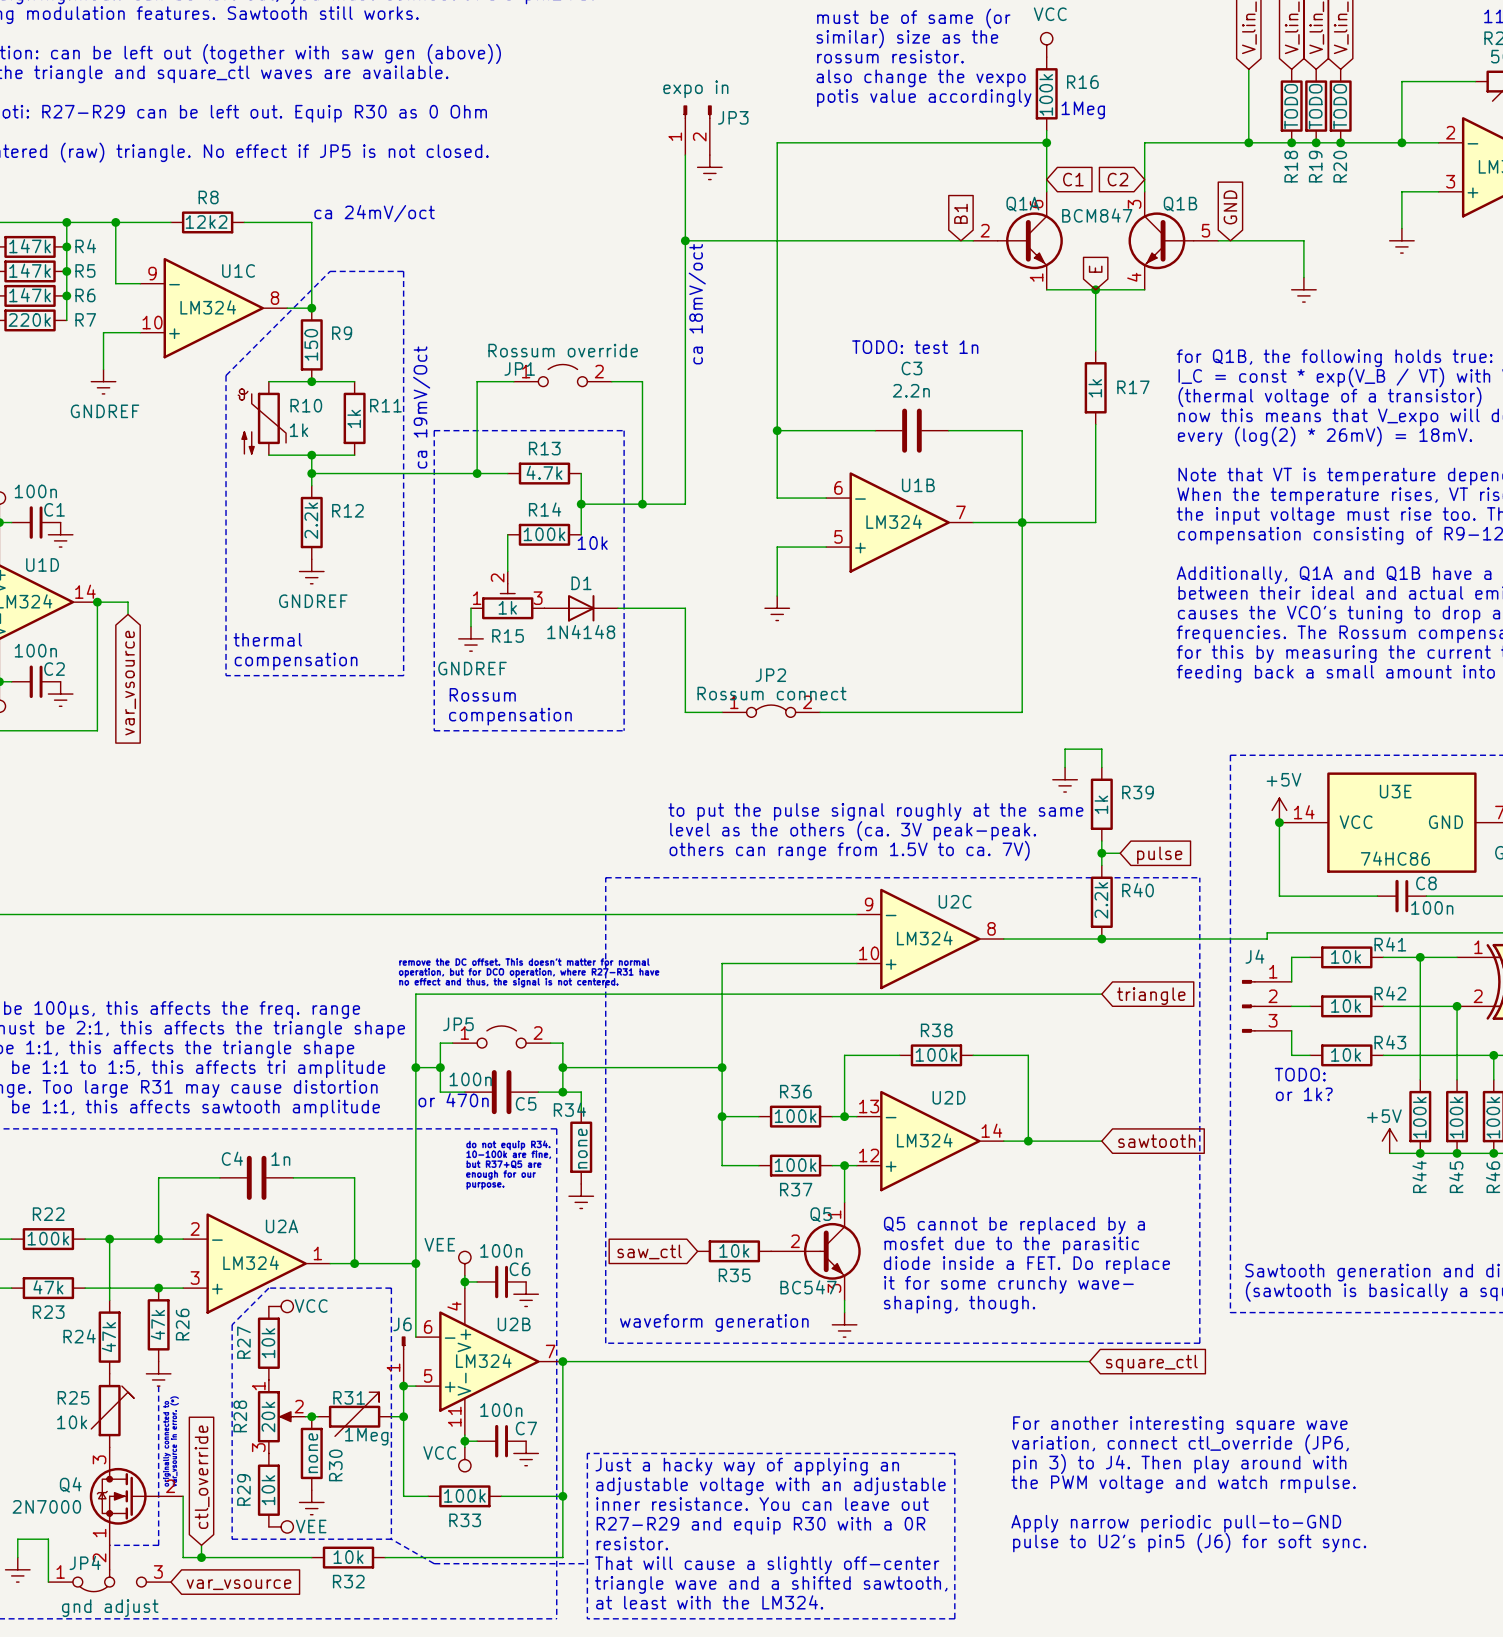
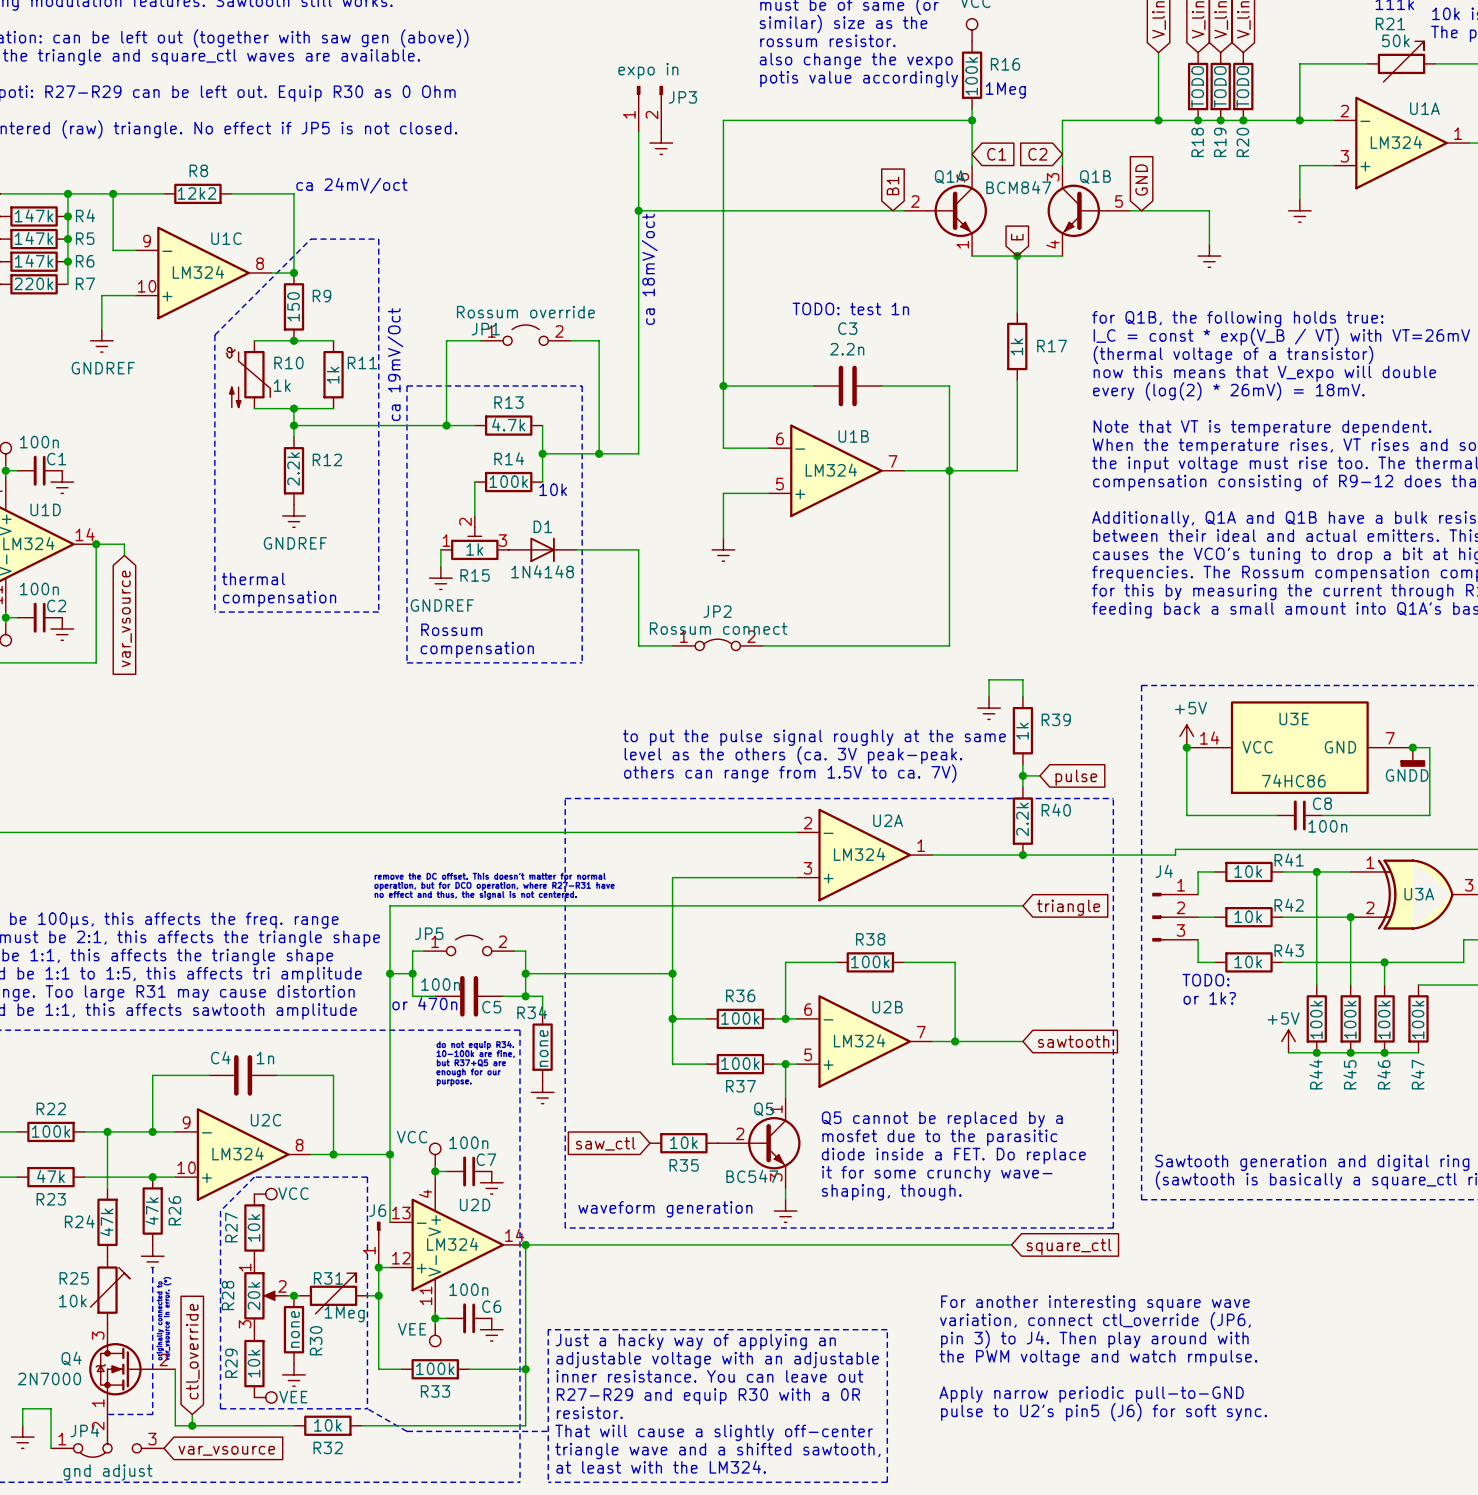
U2C position: (930, 939) -> (243, 1154)
U2D position: (930, 1141) -> (457, 1244)
U2A position: (256, 1263) -> (864, 855)
power symbol: VEE (464, 1263) -> VCC (435, 1154)
C6 name: C6 (519, 1269) -> C7 (486, 1159)
U2B position: (489, 1361) -> (864, 1041)
C7 name: C7 (526, 1428) -> C6 (491, 1306)
power symbol: VCC (464, 1459) -> VEE (435, 1335)

